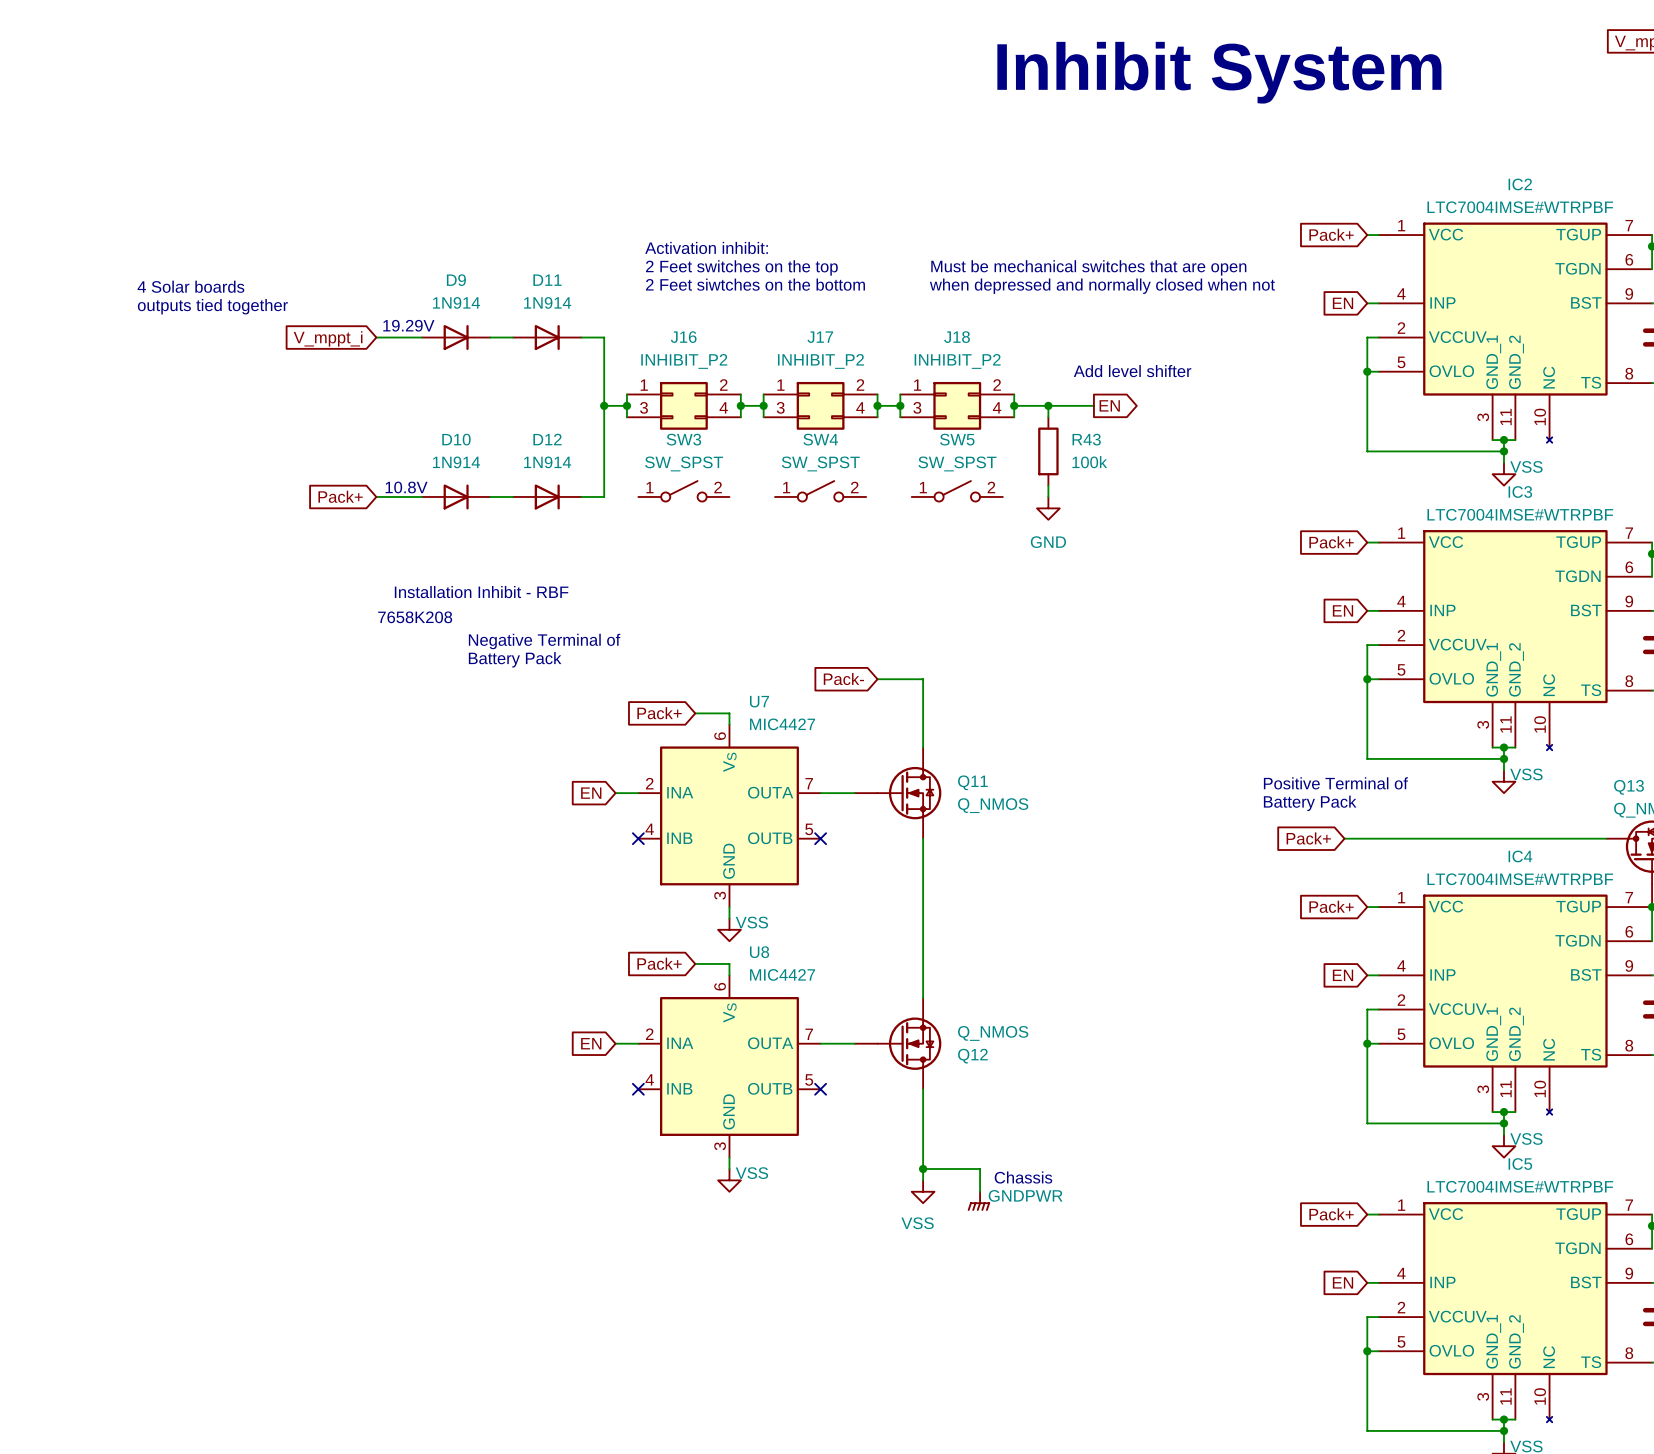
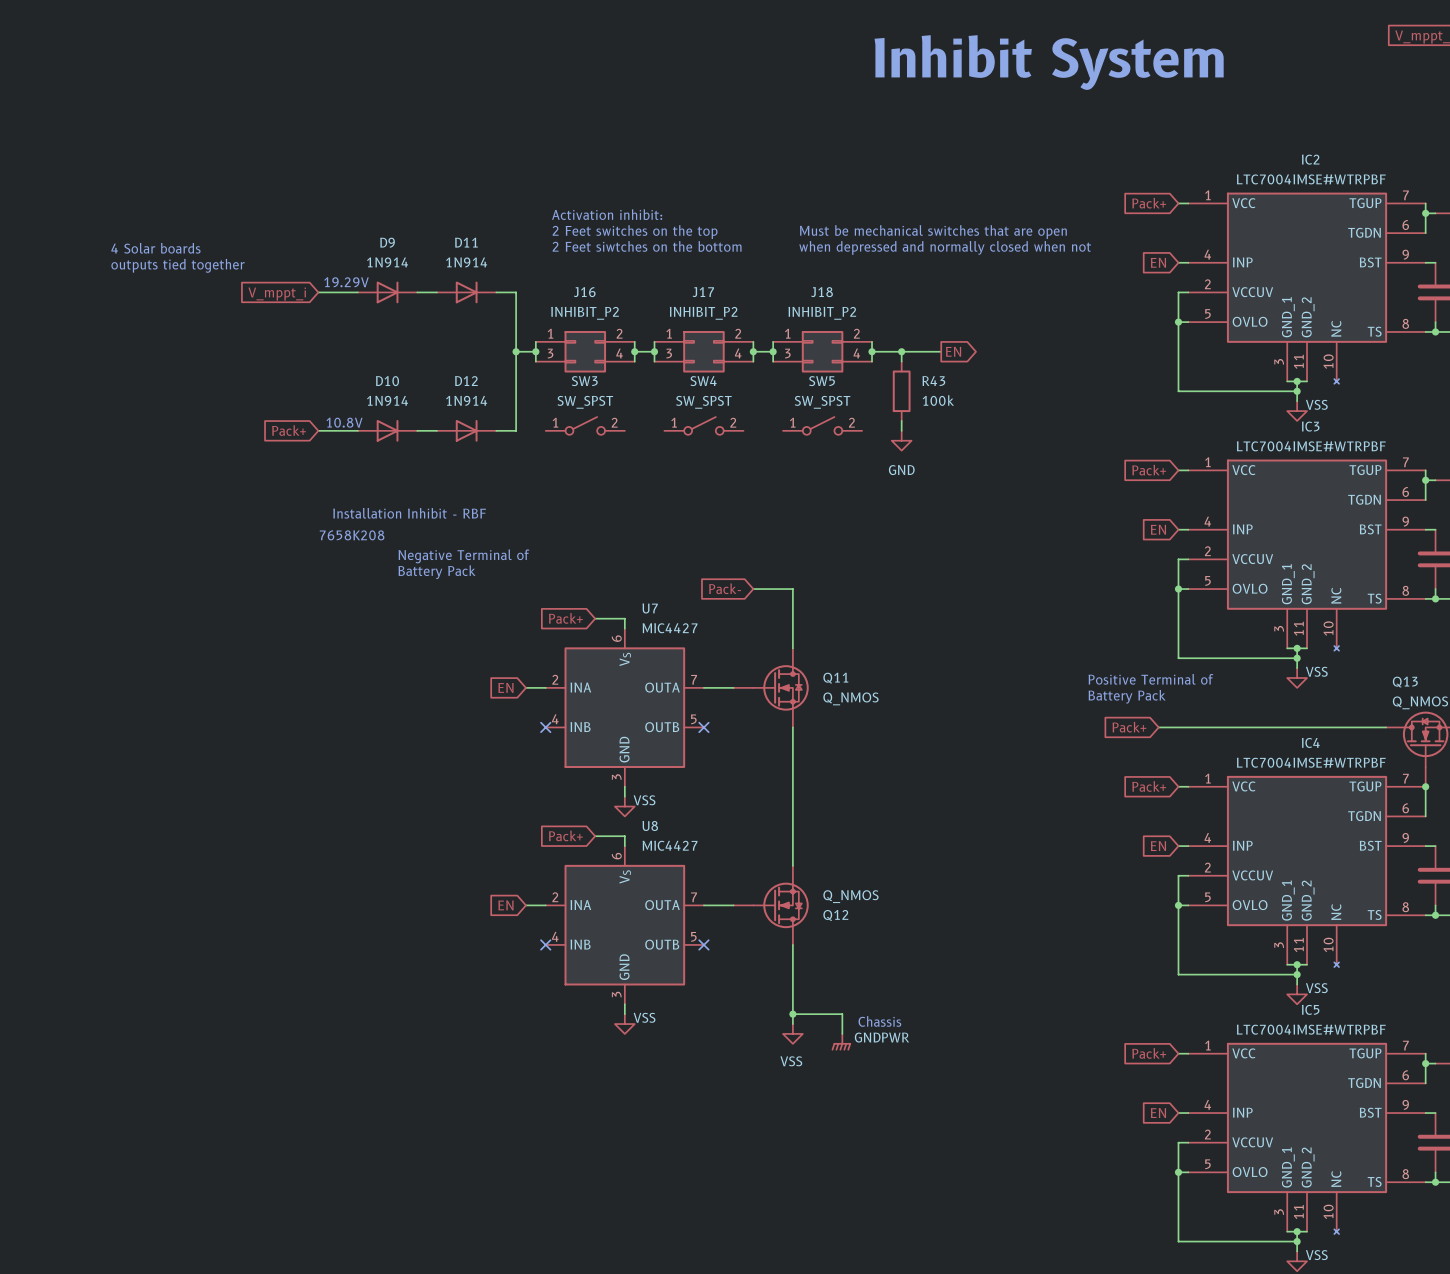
text: Add level shifter (1132, 371) -> none

